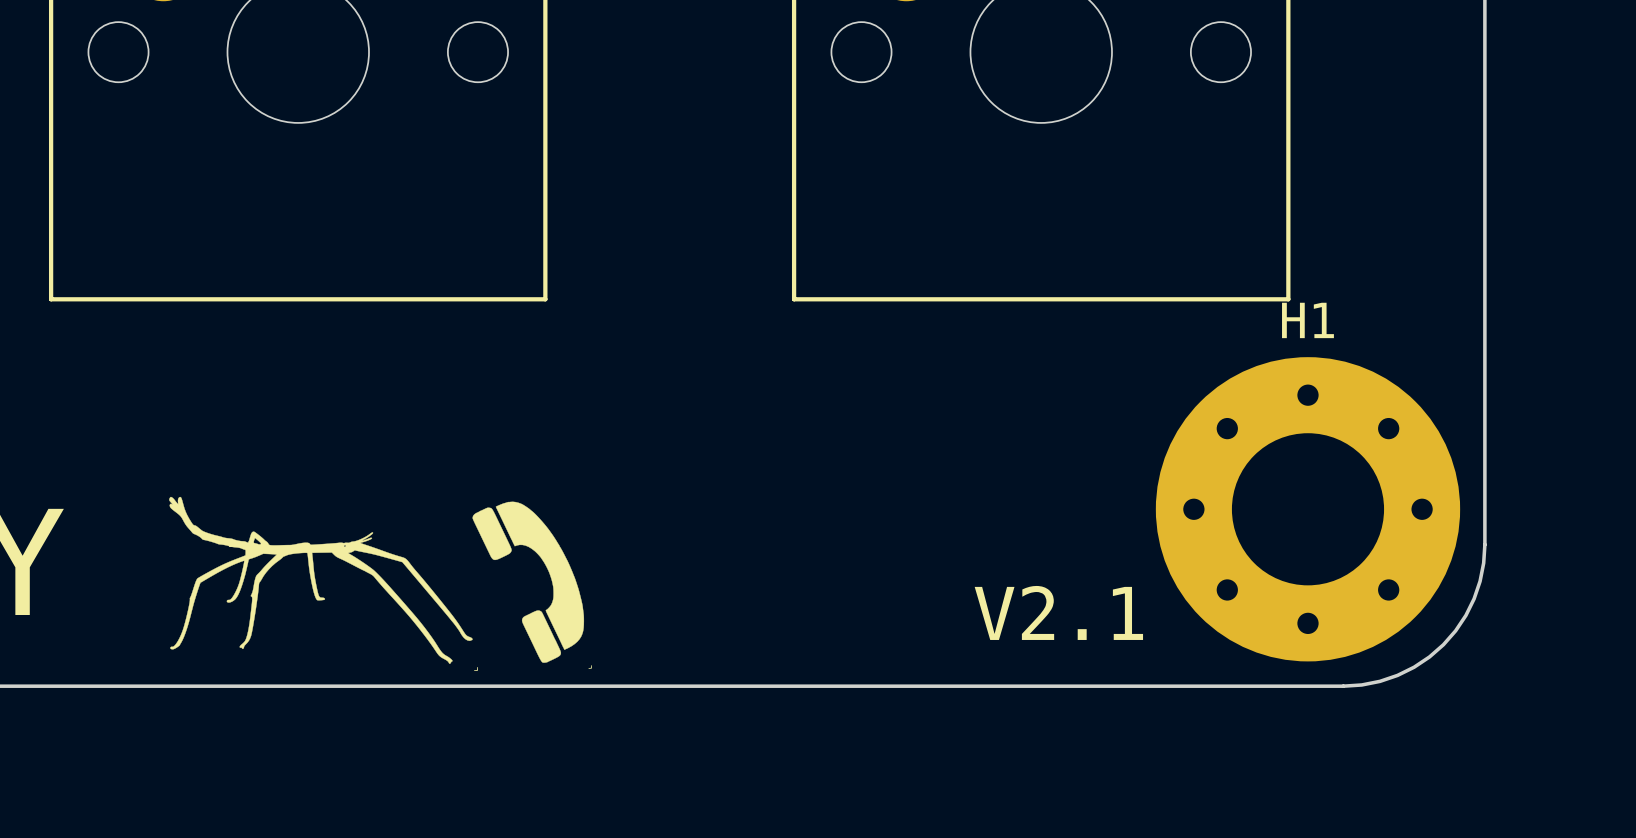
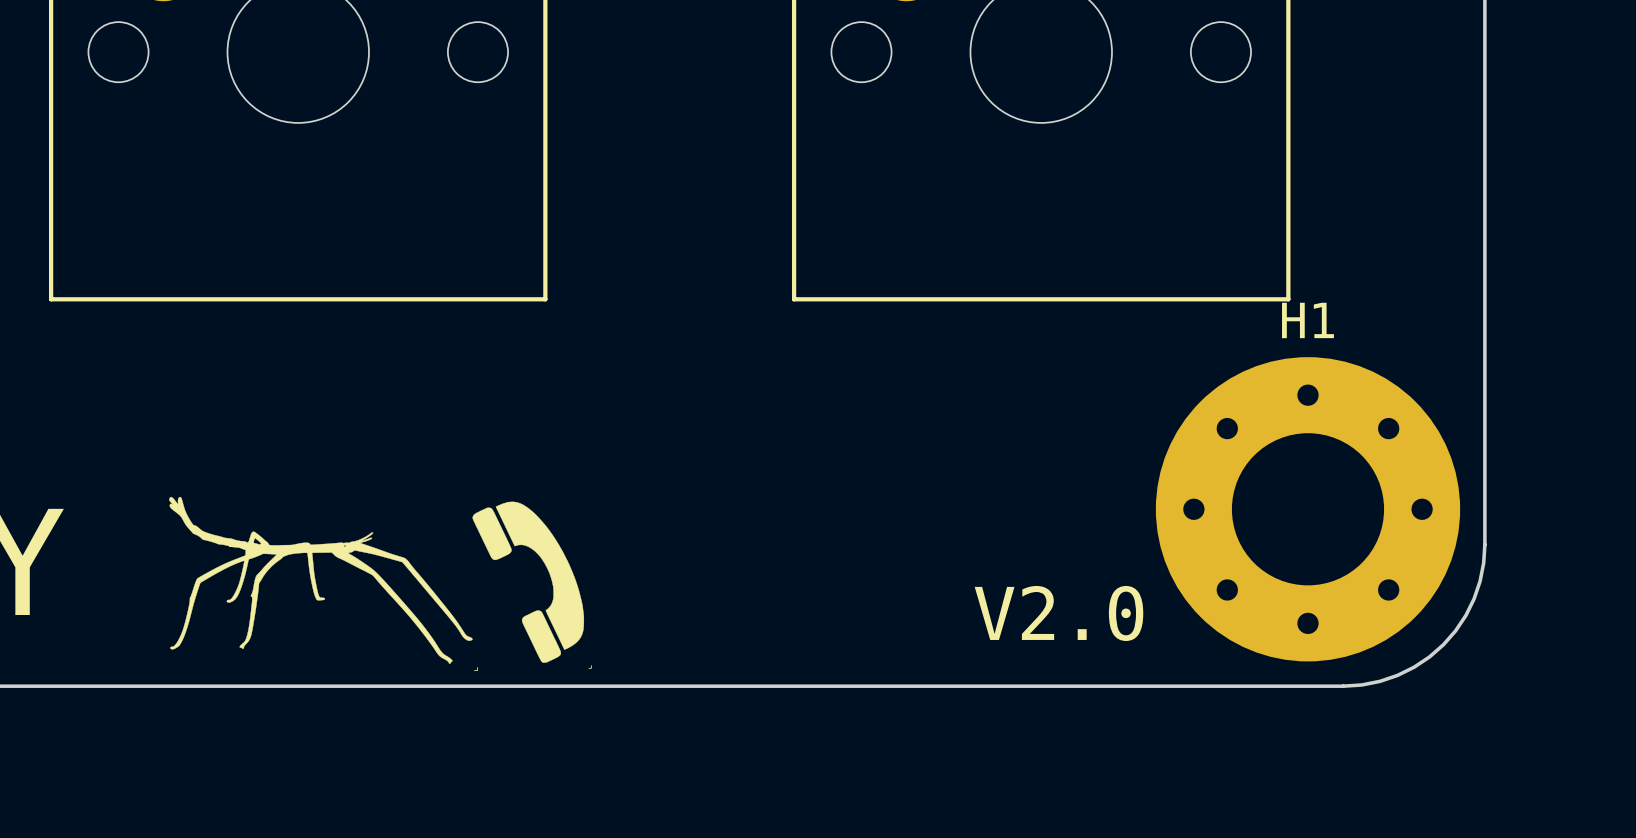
text: V2.1 (1058, 612) -> V2.0 (1058, 613)

